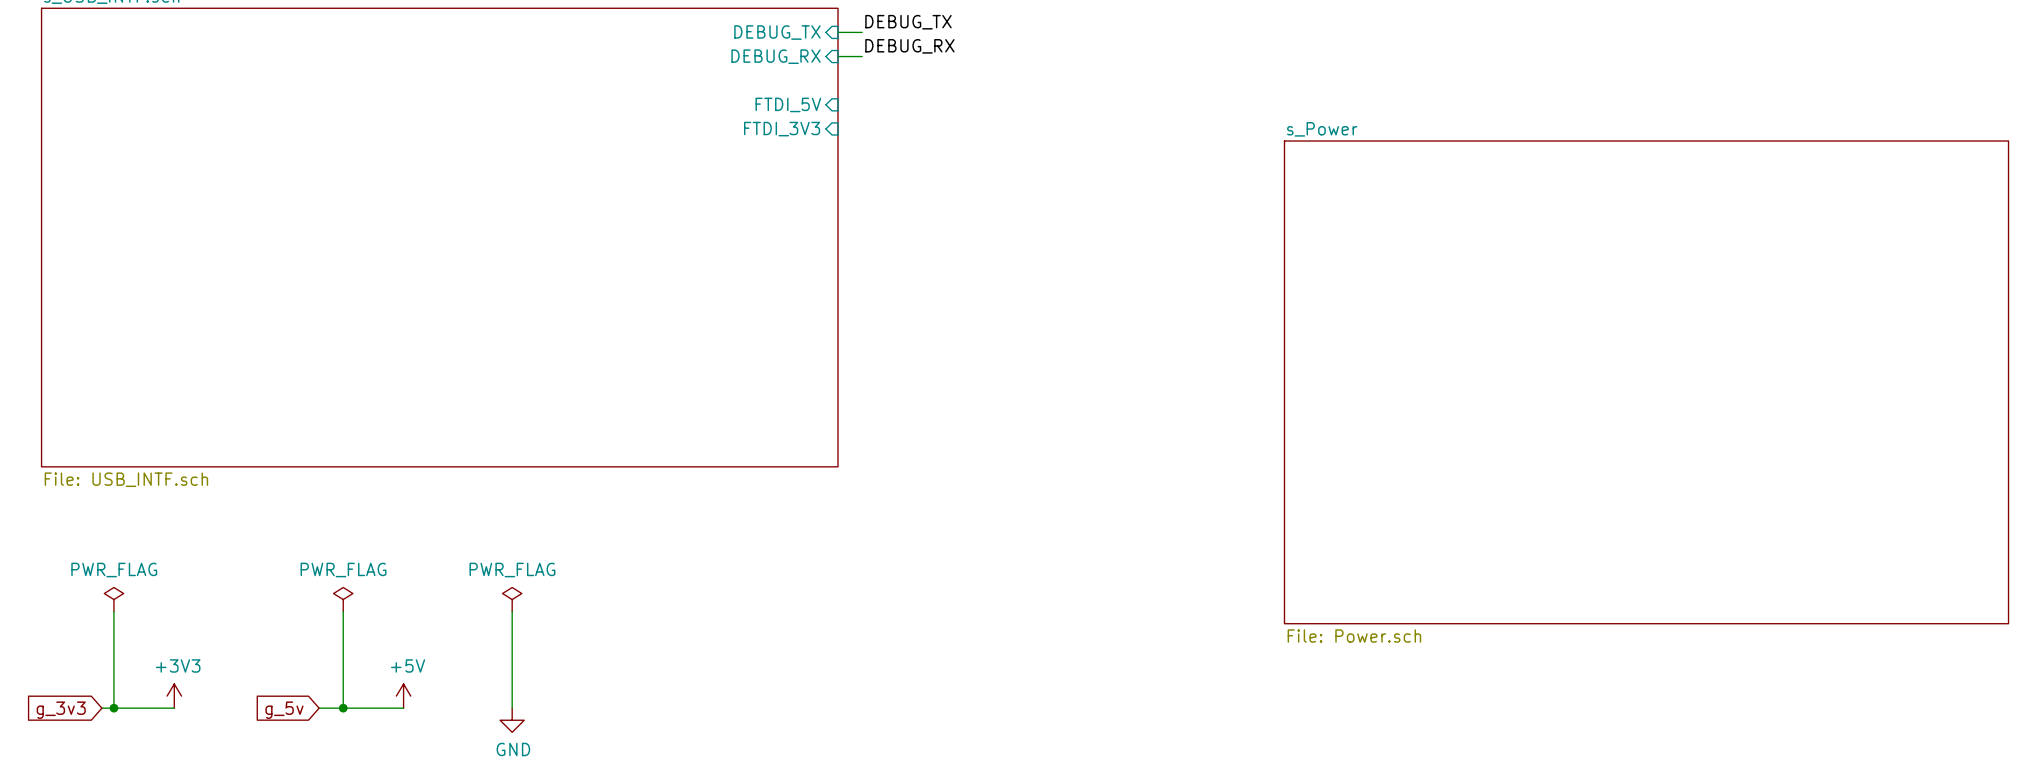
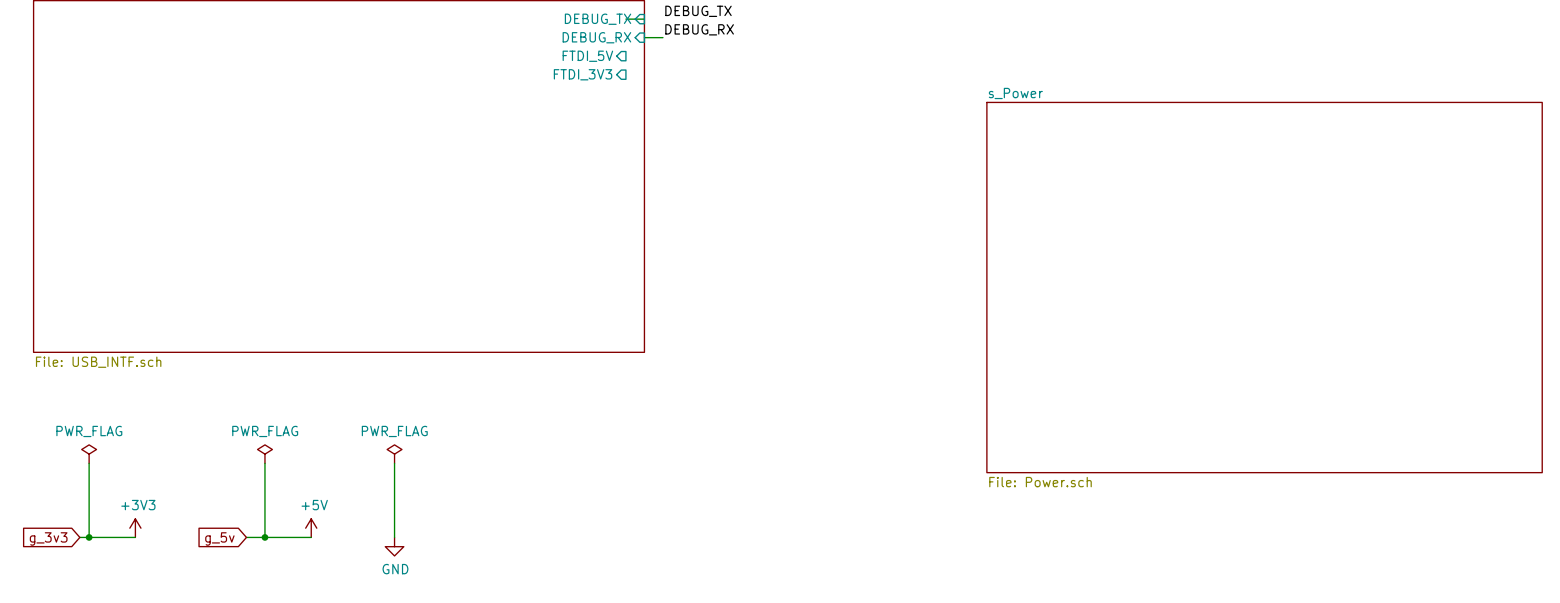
wire: (838, 32) (862, 32) -> (644, 19) (625, 19)
sheet pin position: FTDI_5V (788, 104) -> FTDI_5V (587, 56)
sheet pin position: FTDI_3V3 (782, 129) -> FTDI_3V3 (583, 74)

